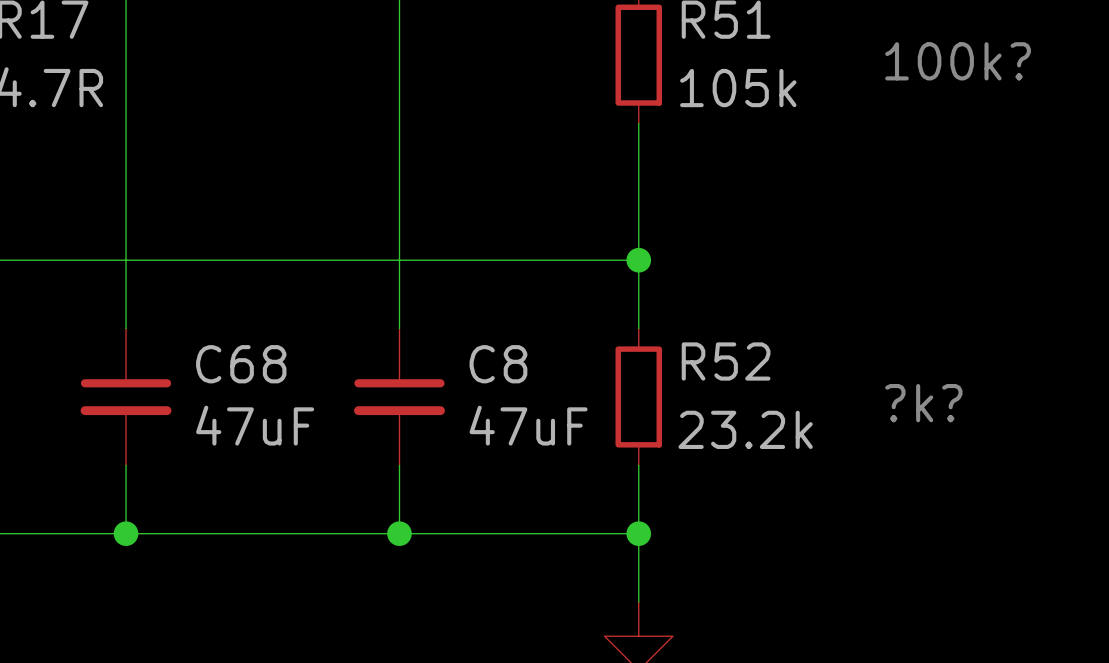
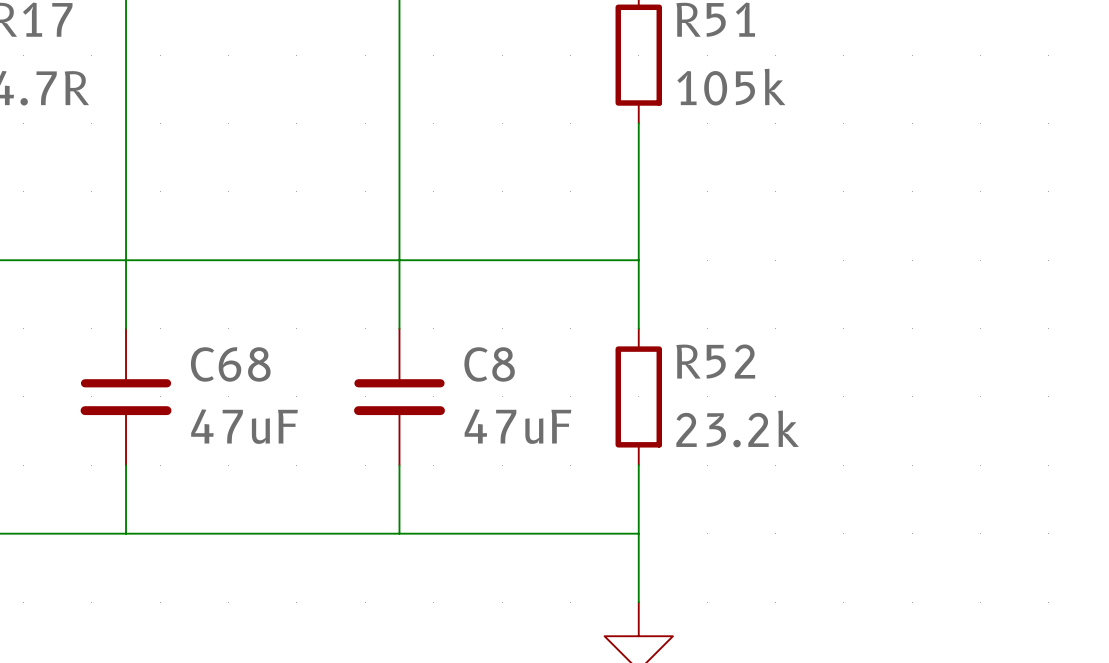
text: 100k? (958, 61) -> none
junction: (638, 260) -> none
text: ?k? (923, 403) -> none
junction: (126, 533) -> none
junction: (399, 533) -> none
junction: (638, 533) -> none

